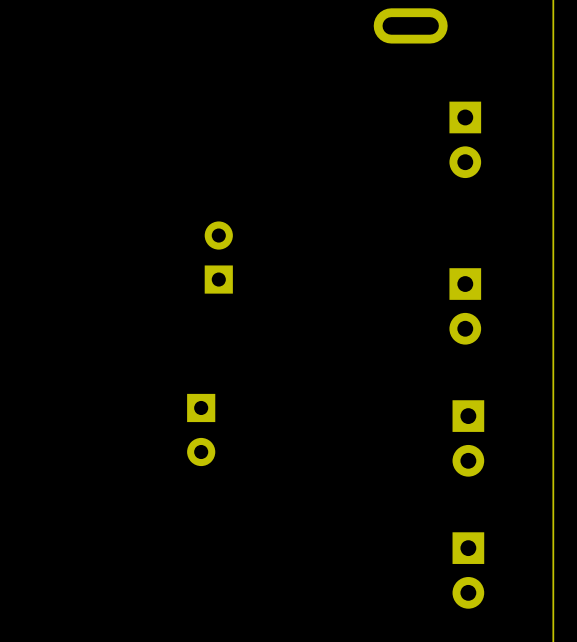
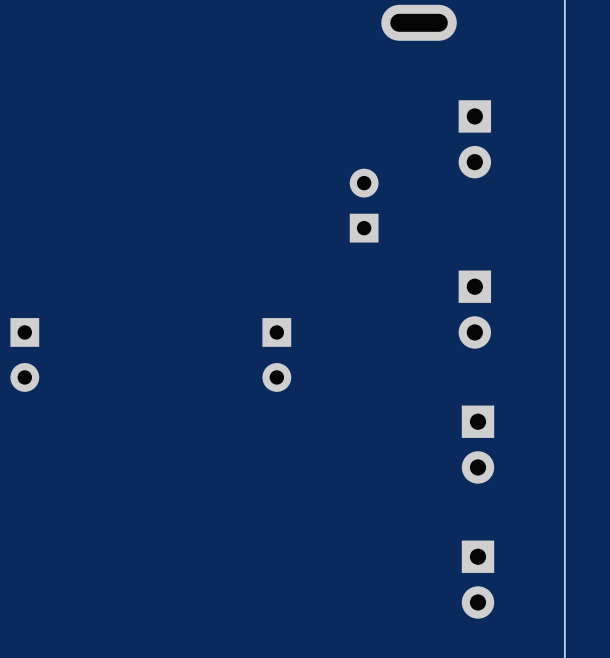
part: none -> (364, 205)
part: (218, 257) -> none
part: none -> (24, 354)
part: none -> (276, 354)
part: (201, 429) -> none

